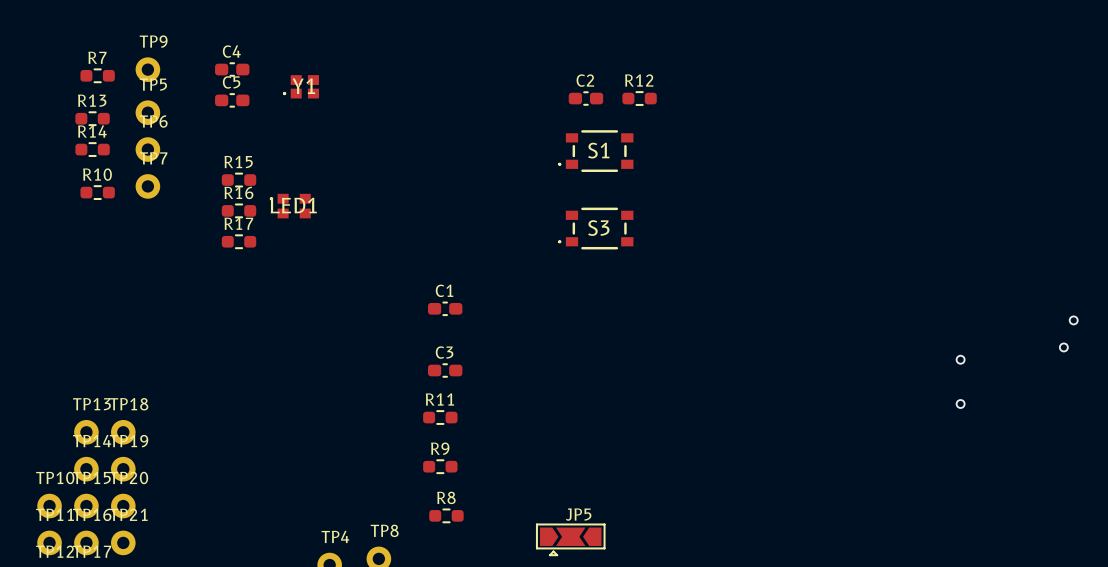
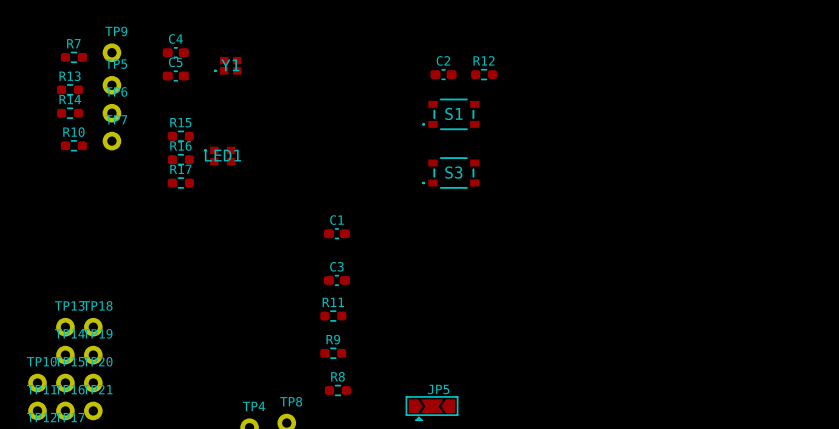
via: (1073, 320) -> none
via: (1063, 347) -> none
via: (960, 359) -> none
via: (960, 404) -> none

